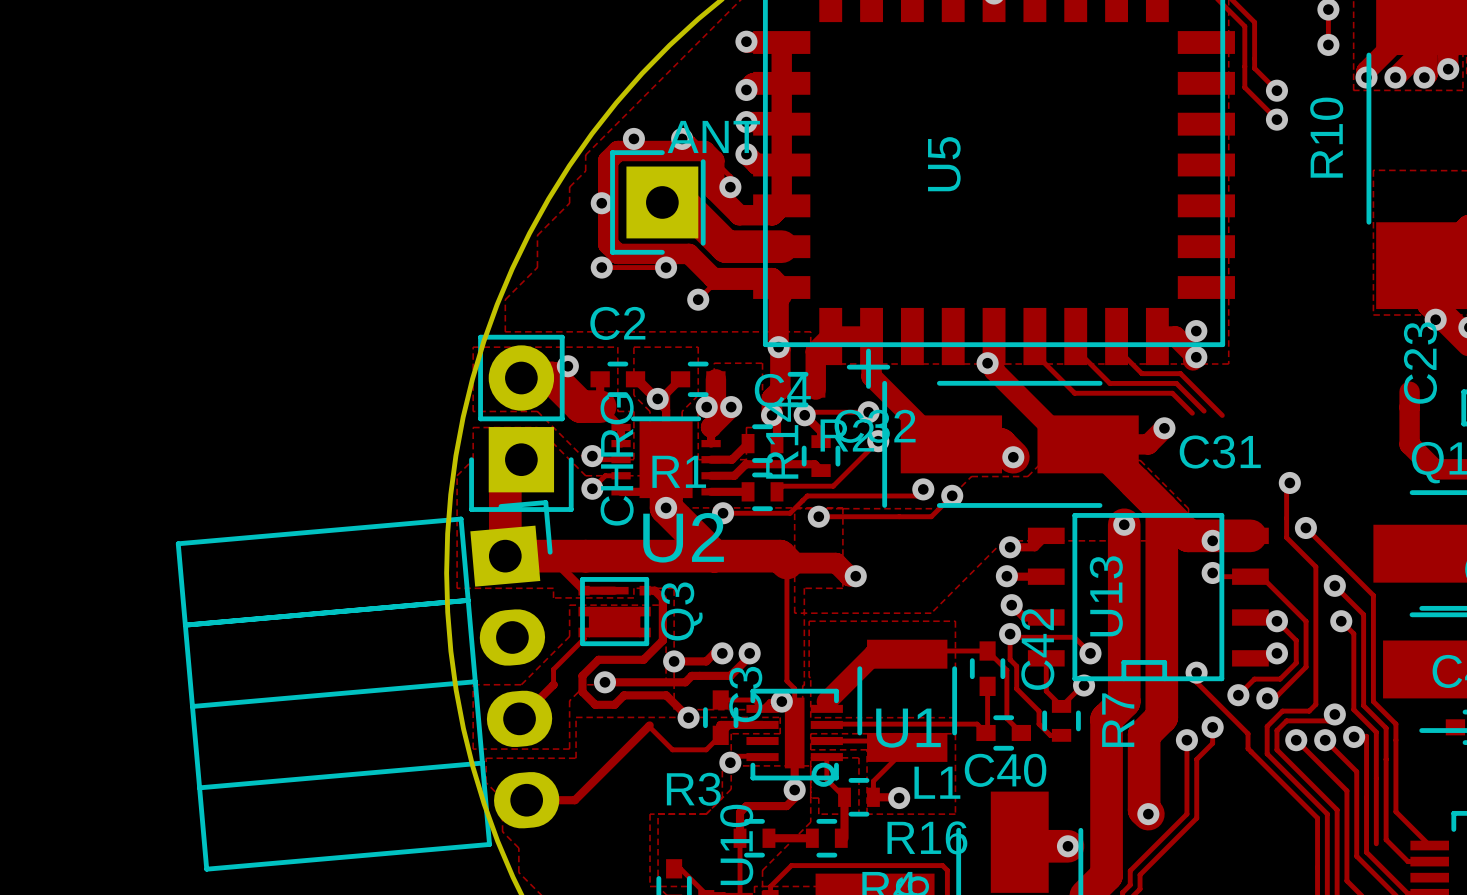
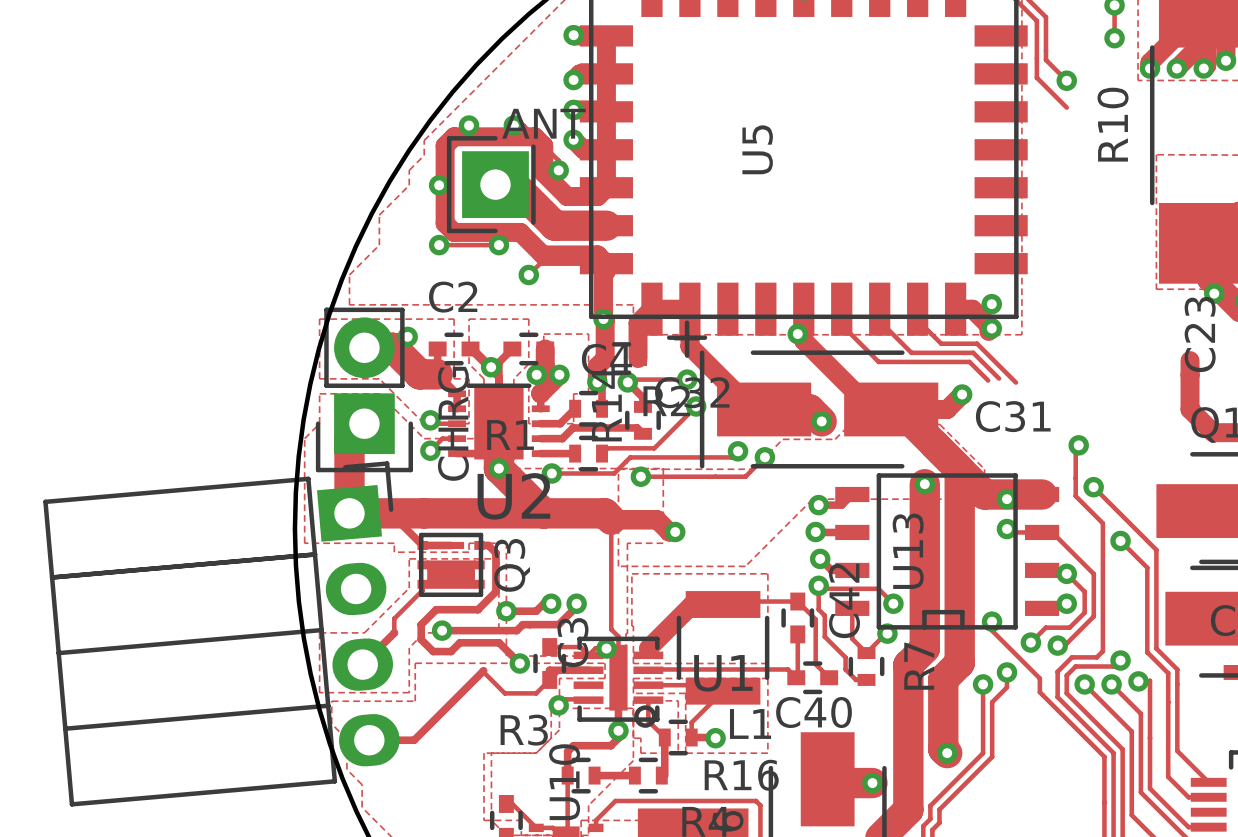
via: (1276, 119) -> none
track: (1341, 621) (1353, 633) (1353, 709) (1376, 732) (1376, 843) -> none
via: (1341, 621) -> none

